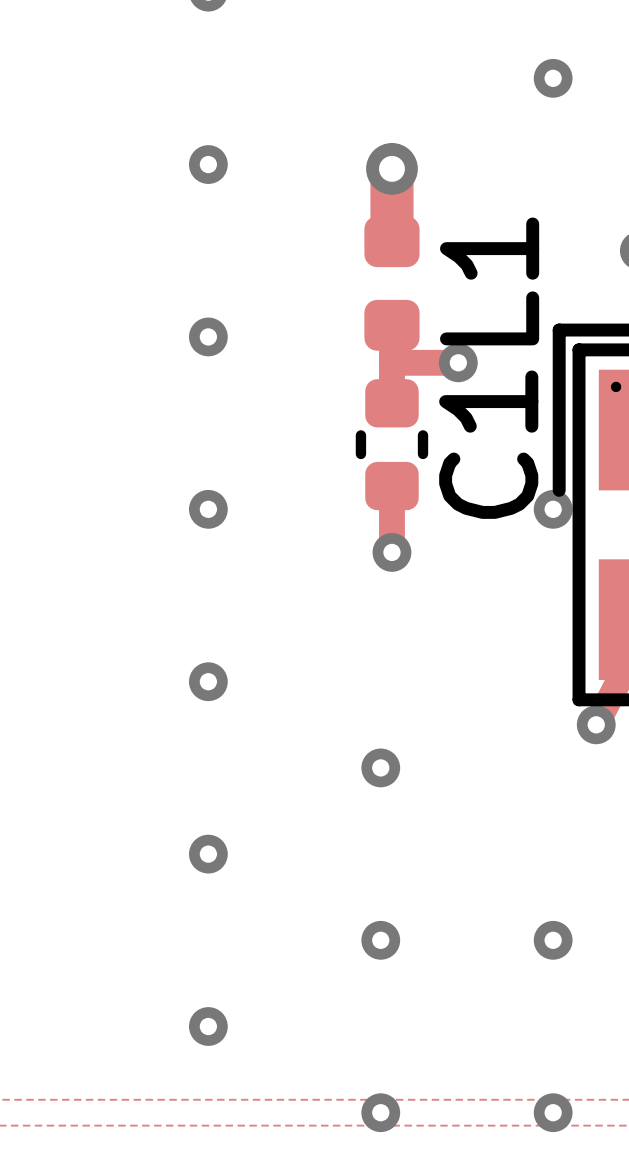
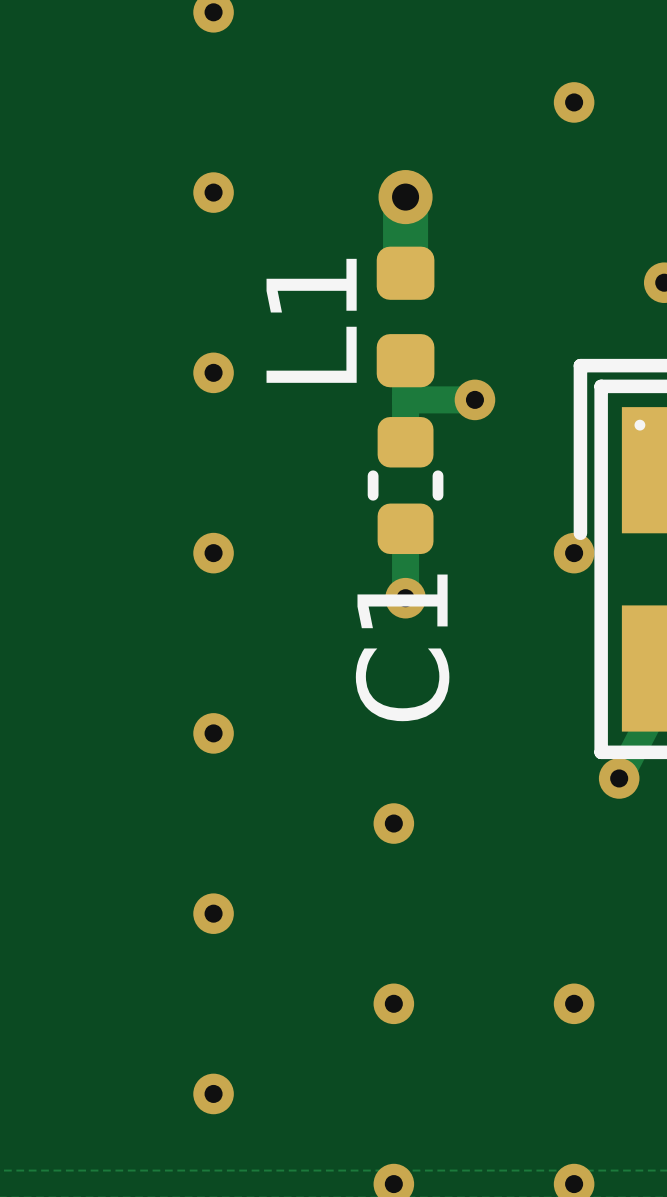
L1 name position: L1 (489, 281) -> L1 (311, 320)
C1 name position: C1 (488, 444) -> C1 (402, 647)

